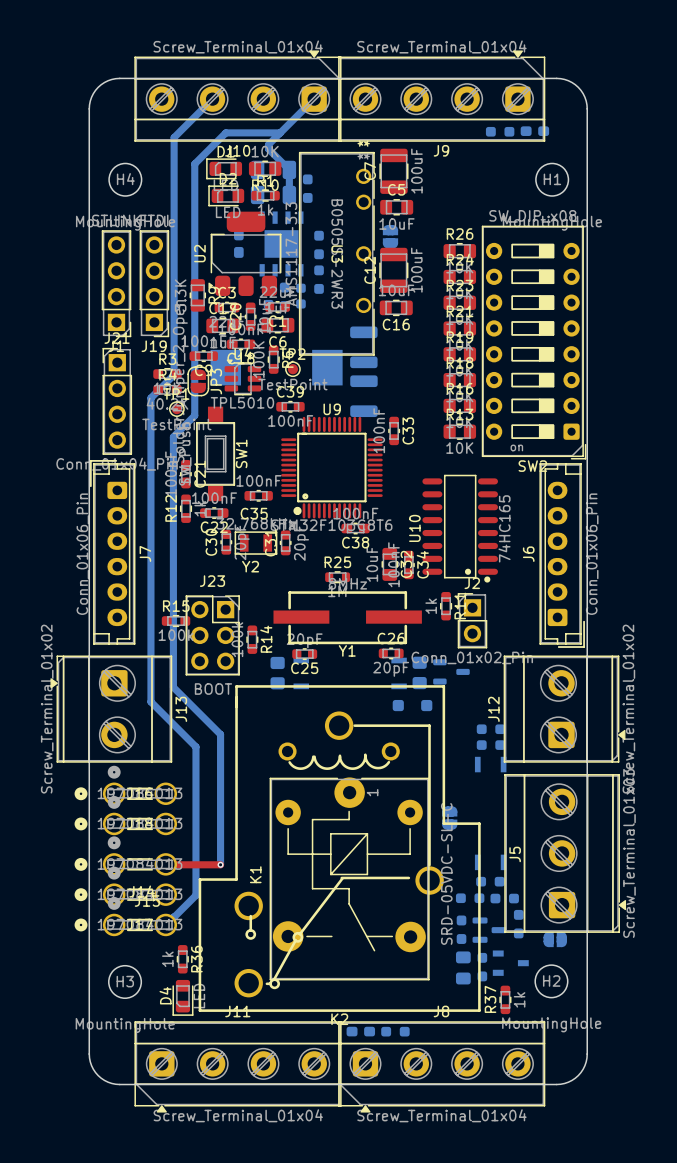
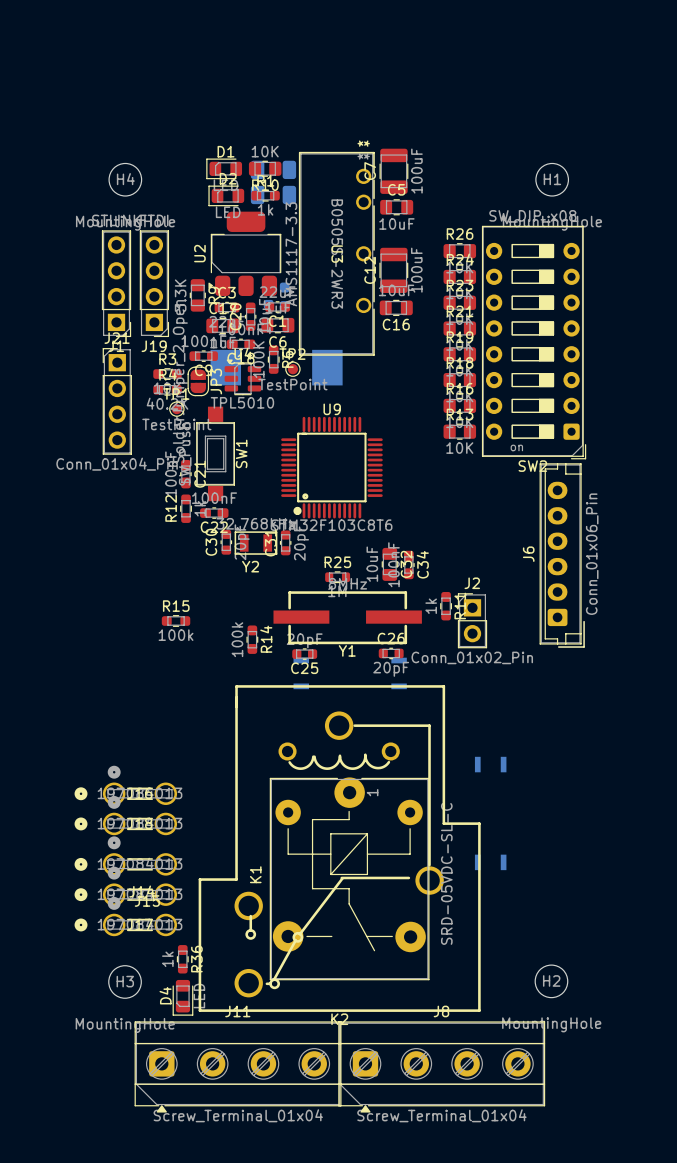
board edge: (119, 78) (556, 78) (571, 82) (578, 87) (584, 97) (587, 108) (587, 1054) (583, 1069) (575, 1078) (568, 1082) (556, 1084) (119, 1084) (111, 1083) (101, 1078) (91, 1065) (89, 1054) (89, 108) (91, 97) (98, 87) (108, 80) (119, 78) -> none
J10: Screw_Terminal_01x04 (237, 96) -> none
J9: Screw_Terminal_01x04 (441, 96) -> none
bottom track: (212, 99) (174, 137) (174, 374) (150, 398) (150, 701) (195, 746) (195, 895) (165, 924) -> none
bottom track: (314, 99) (268, 144) (268, 149) (289, 169) (289, 194) -> none
part: (500, 131) -> none
part: (534, 131) -> none
bottom track: (280, 132) (225, 132) (194, 163) (194, 415) (173, 436) (173, 687) (220, 734) (220, 864) -> none
part: (307, 188) -> none
part: (390, 236) -> none
part: (238, 243) -> none
part: (281, 243) -> none
part: (319, 244) -> none
part: (319, 279) -> none
part: (300, 296) -> none
part: (363, 347) -> none
part: (363, 396) -> none
C39: 100nF (290, 406) -> none
C33: 100nF (394, 430) -> none
C35: 100nF (258, 495) -> none
C38: 100nF (355, 528) -> none
U10: 74HC165 (460, 528) -> none
J7: Conn_01x06_Pin (112, 552) -> none
J23: BOOT (212, 635) -> none
part: (451, 671) -> none
part: (419, 672) -> none
part: (277, 673) -> none
part: (412, 705) -> none
J13: Screw_Terminal_01x02 (111, 709) -> none
J12: Screw_Terminal_01x02 (564, 709) -> none
part: (490, 729) -> none
part: (490, 745) -> none
part: (449, 818) -> none
J5: Screw_Terminal_01x03 (565, 853) -> none
top track: (165, 864) (220, 864) -> none
via: (220, 864) -> none
part: (490, 881) -> none
part: (470, 898) -> none
part: (504, 898) -> none
part: (518, 924) -> none
part: (461, 929) -> none
part: (489, 930) -> none
part: (555, 939) -> none
part: (510, 963) -> none
part: (463, 967) -> none
part: (482, 967) -> none
R37: 1k (505, 999) -> none
part: (360, 1031) -> none
part: (395, 1031) -> none

